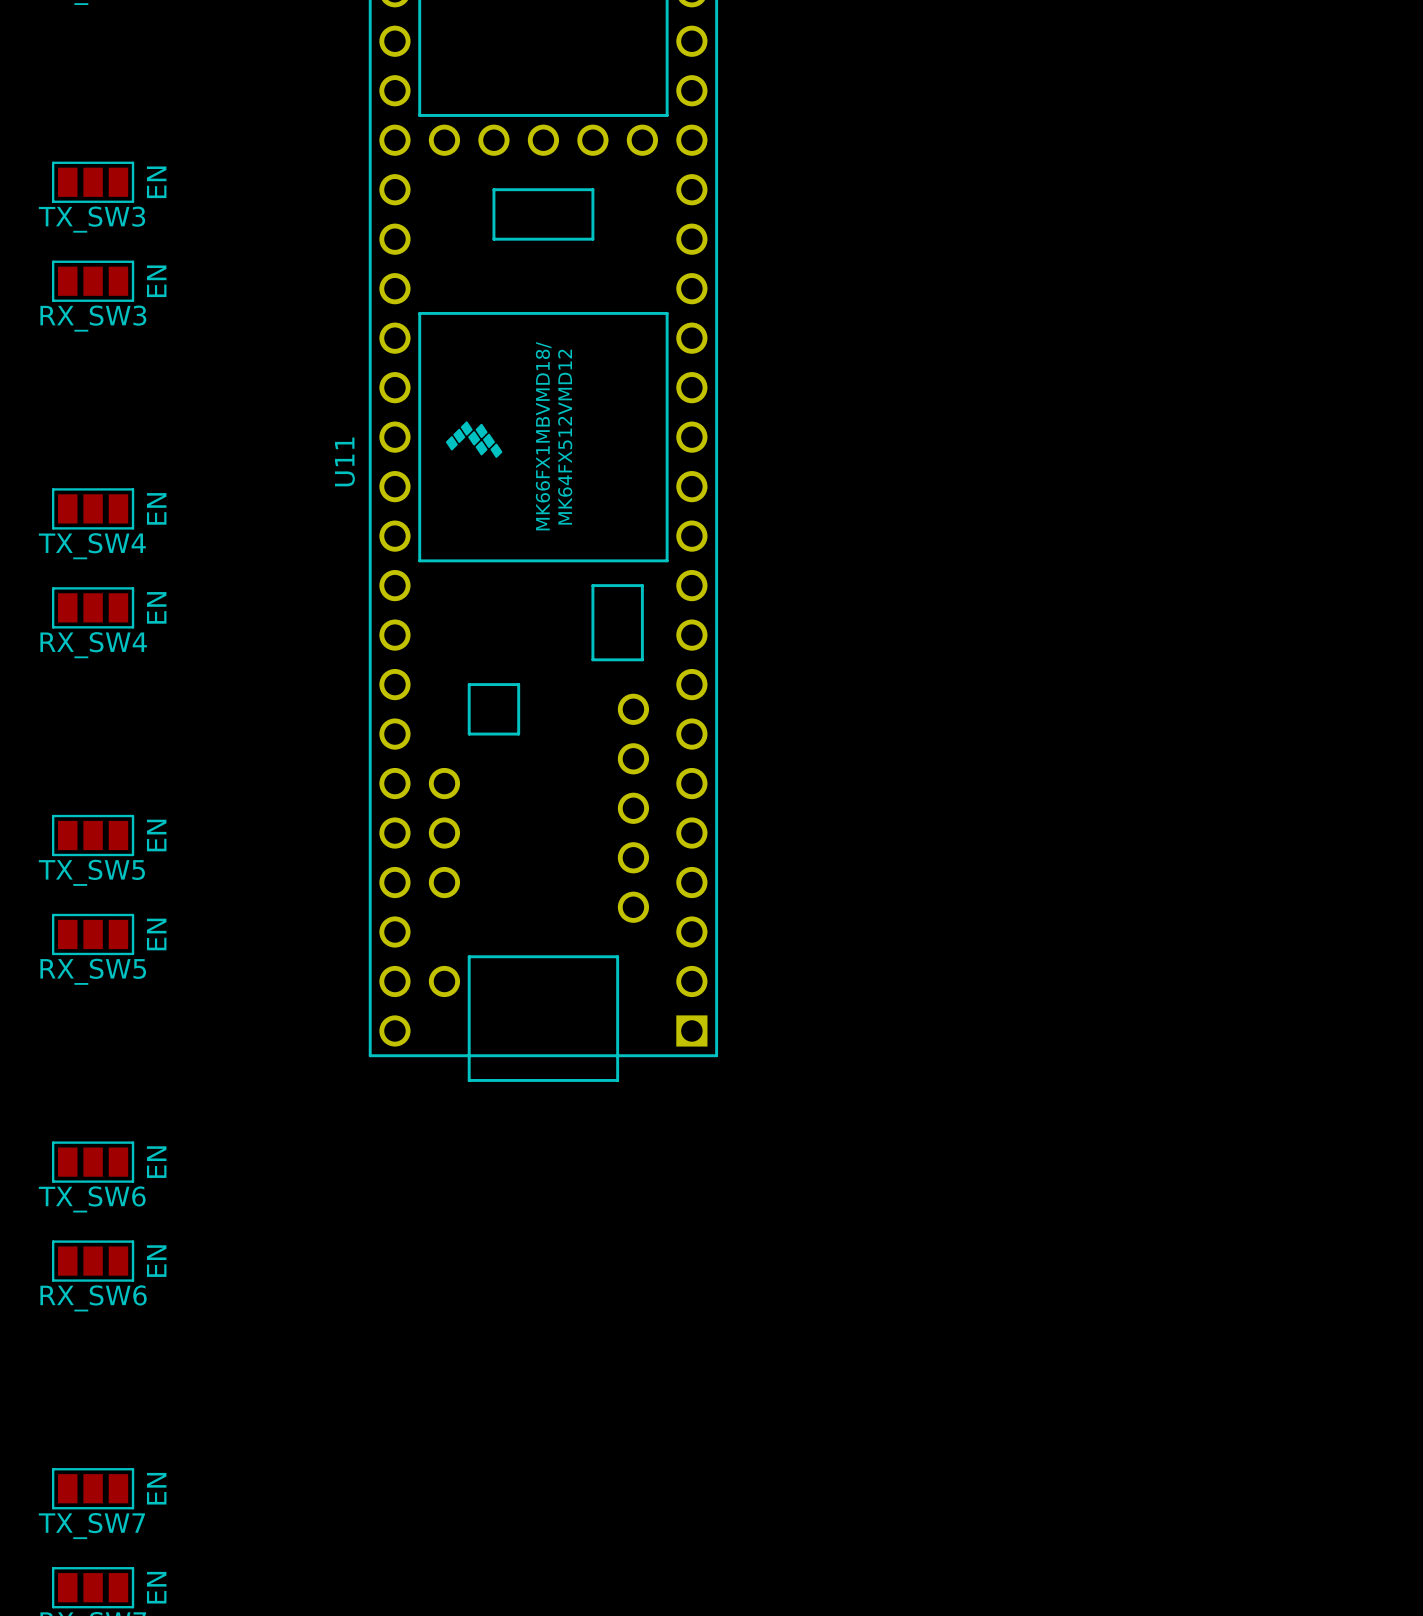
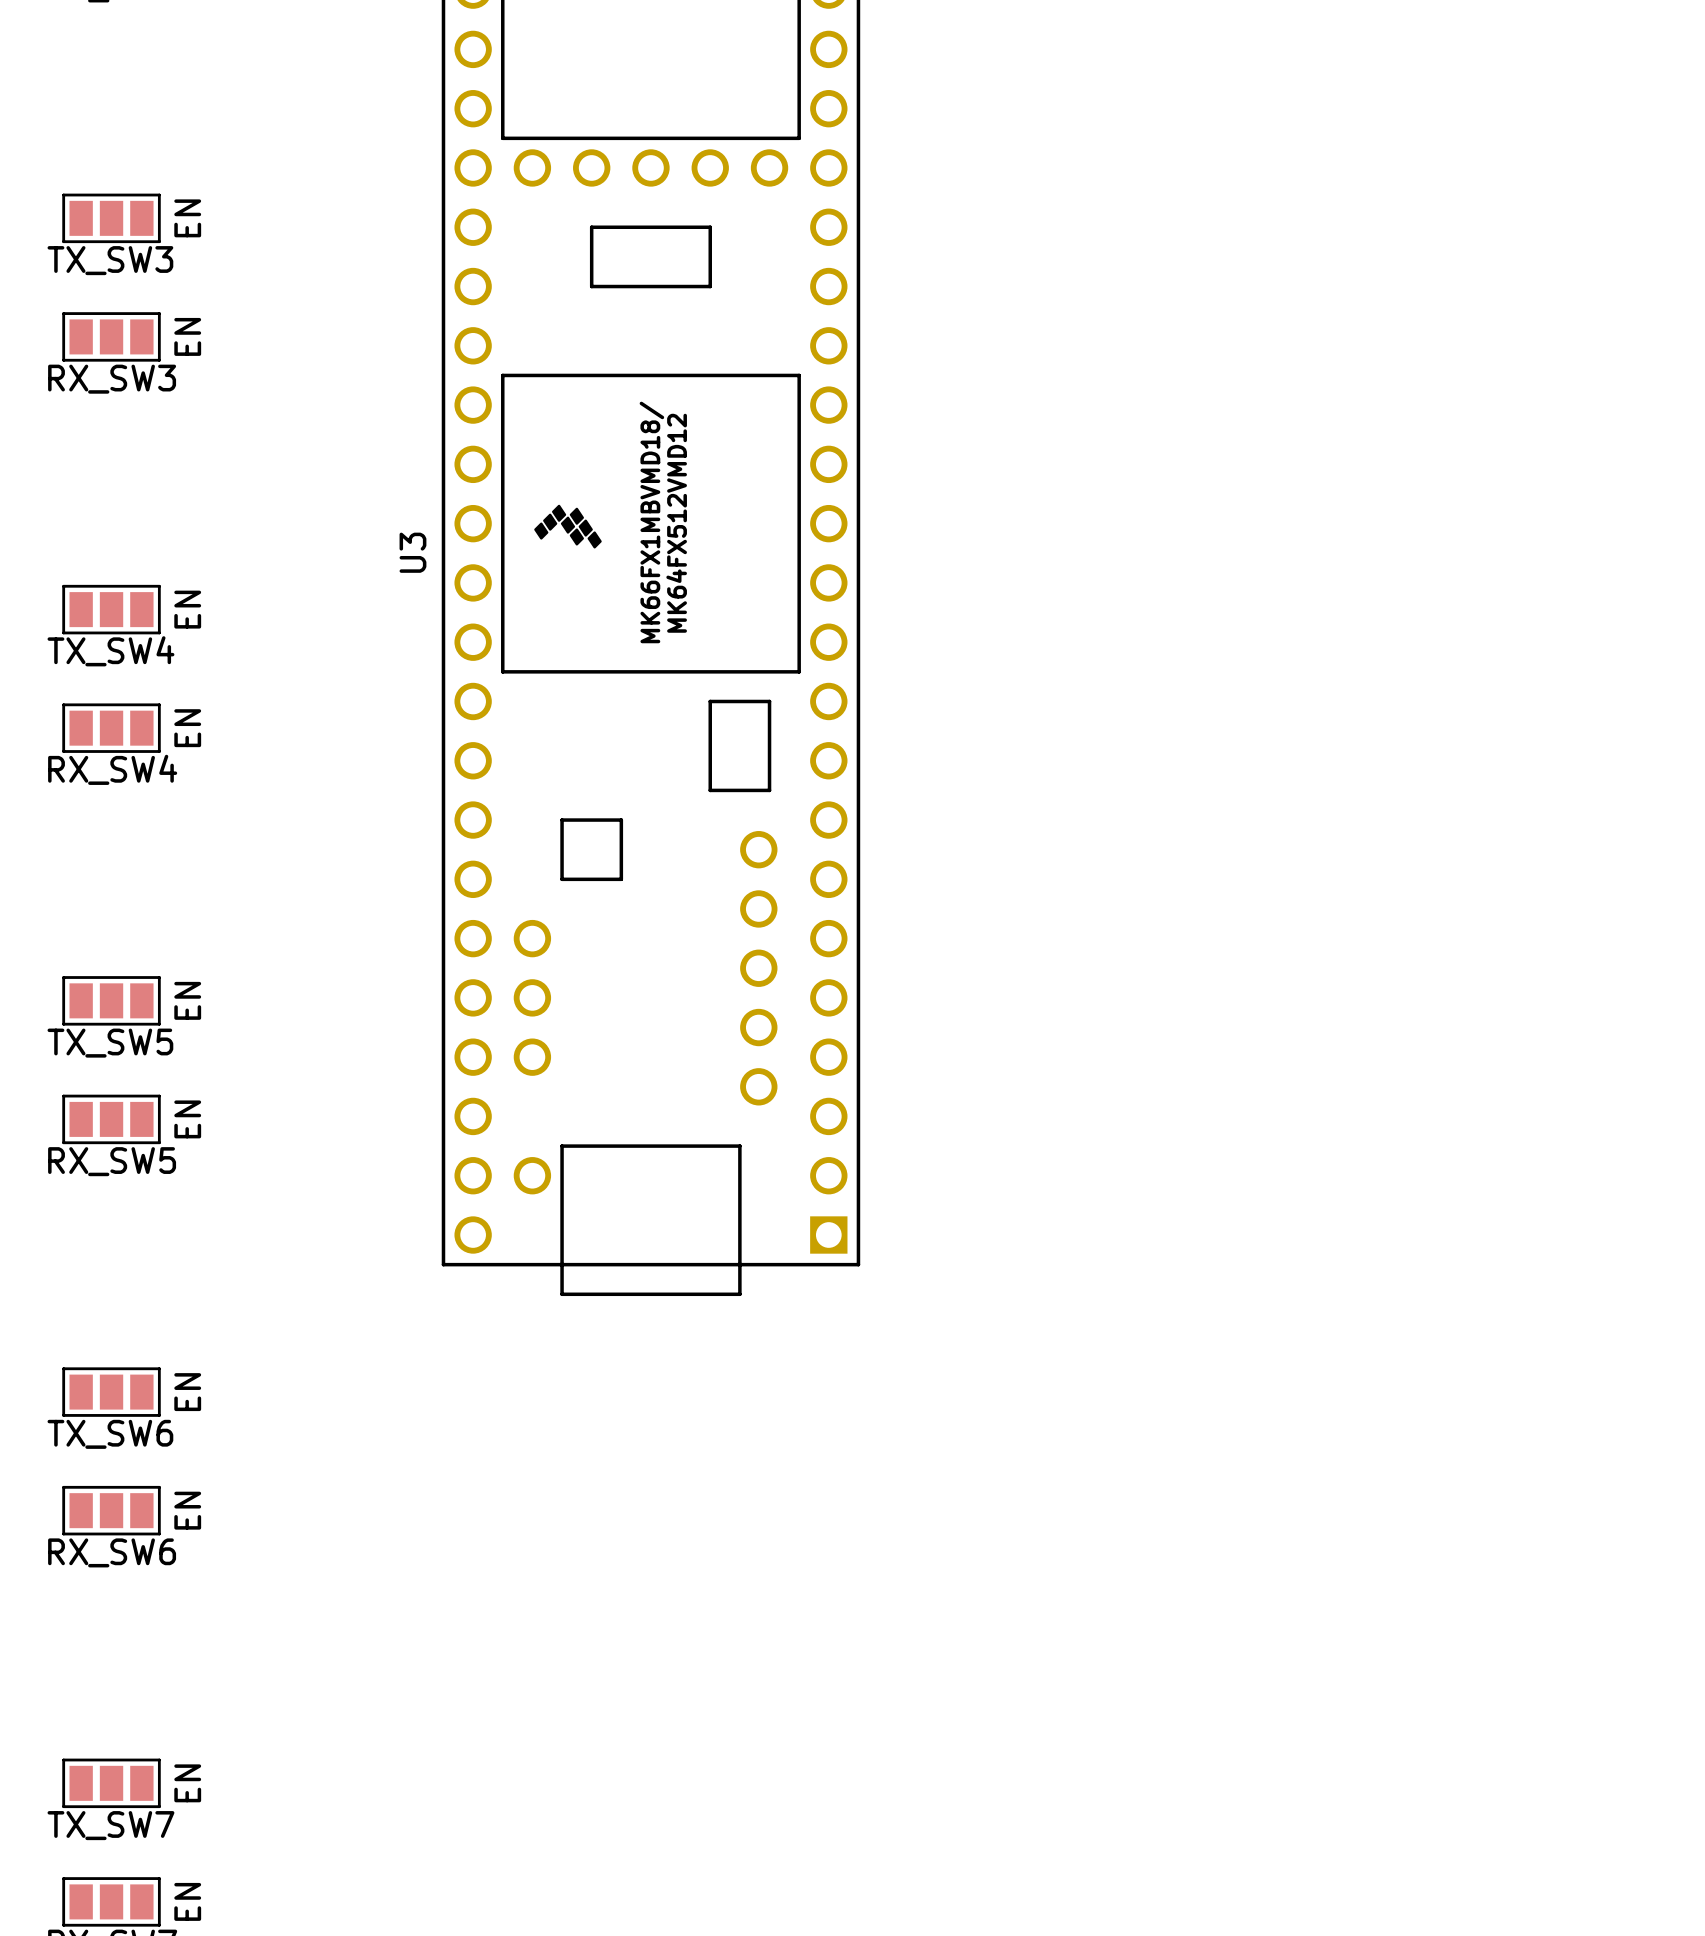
U11 name: U11 (344, 461) -> U3 (412, 552)

